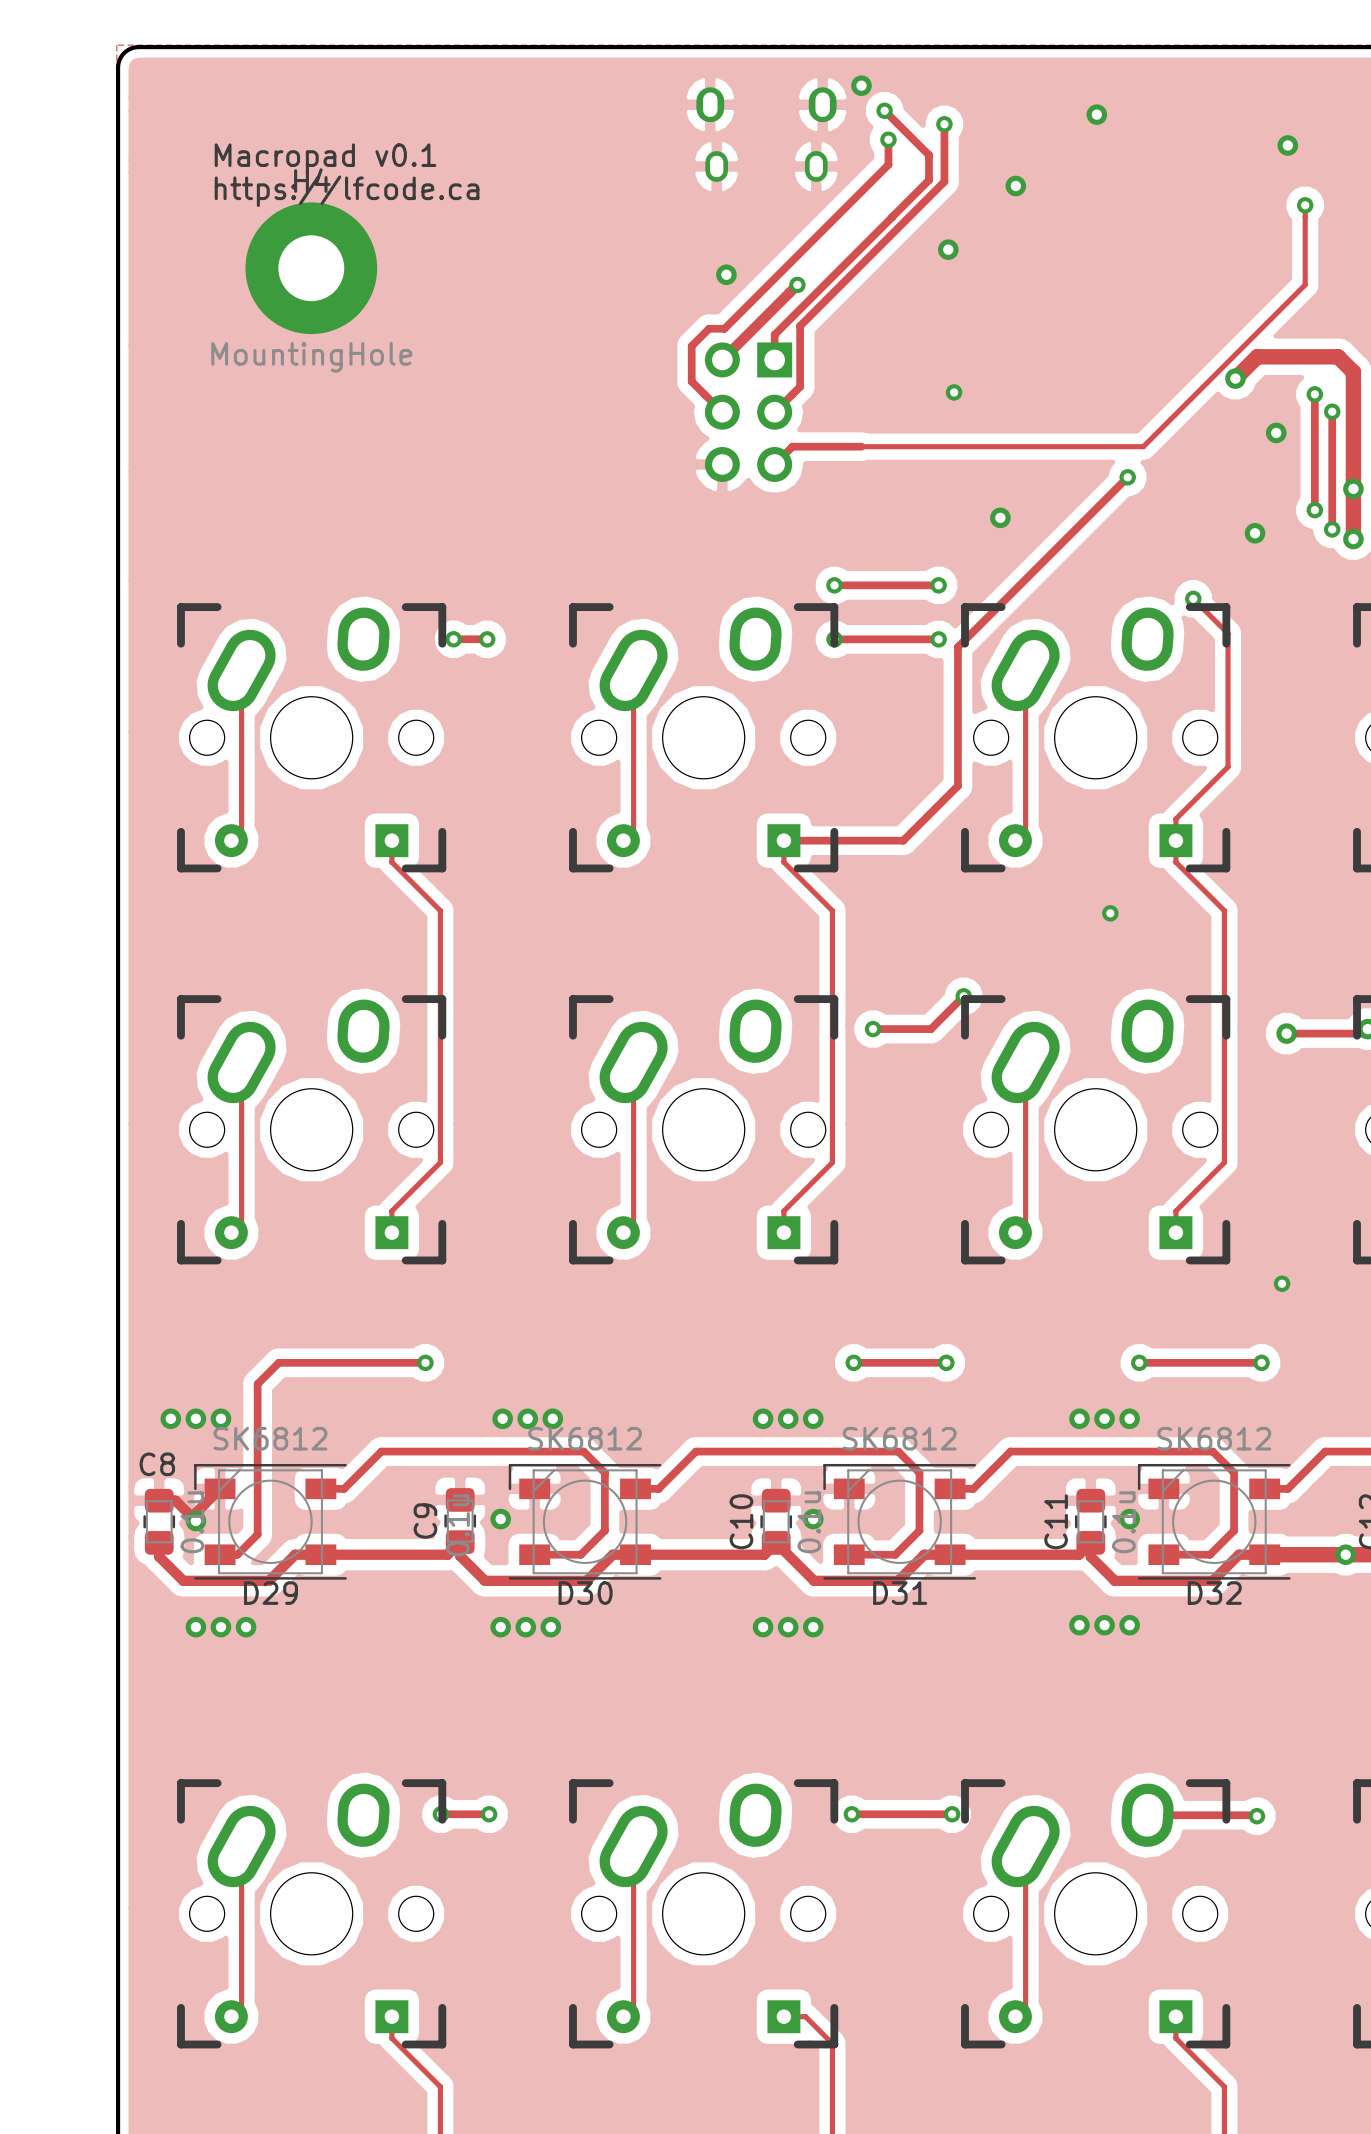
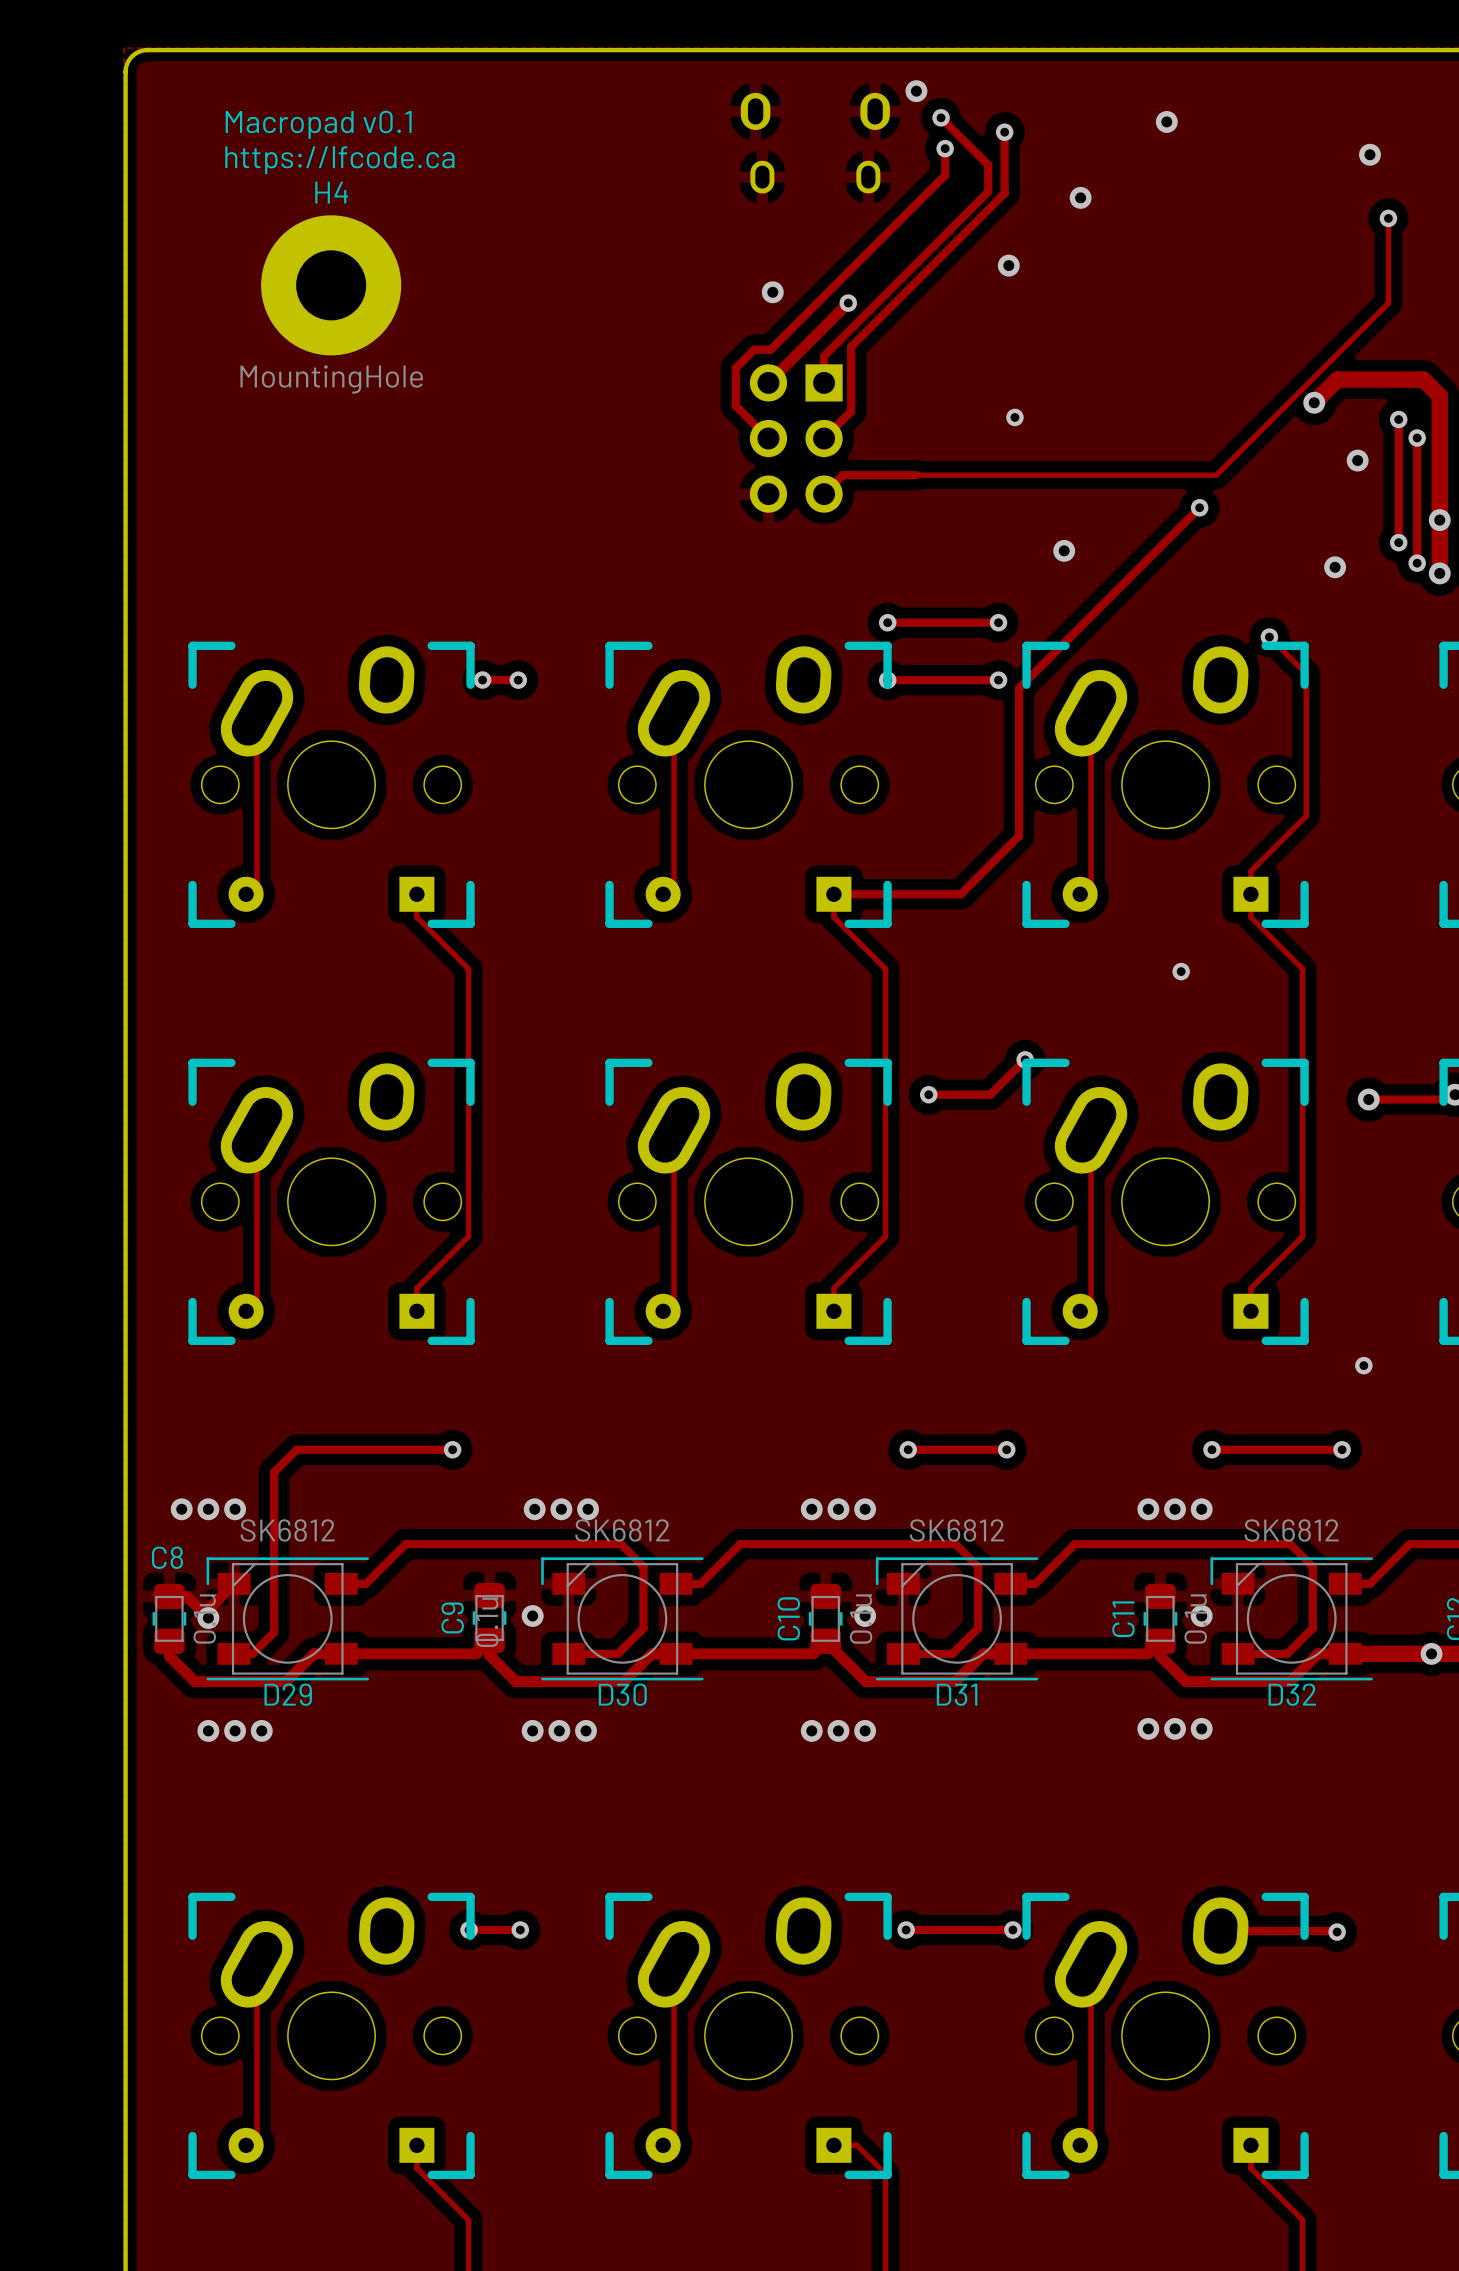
text position: Macropad v0.1 (325, 158) -> Macropad v0.1 (318, 124)
text position: https://lfcode.ca (347, 191) -> https://lfcode.ca (339, 160)

